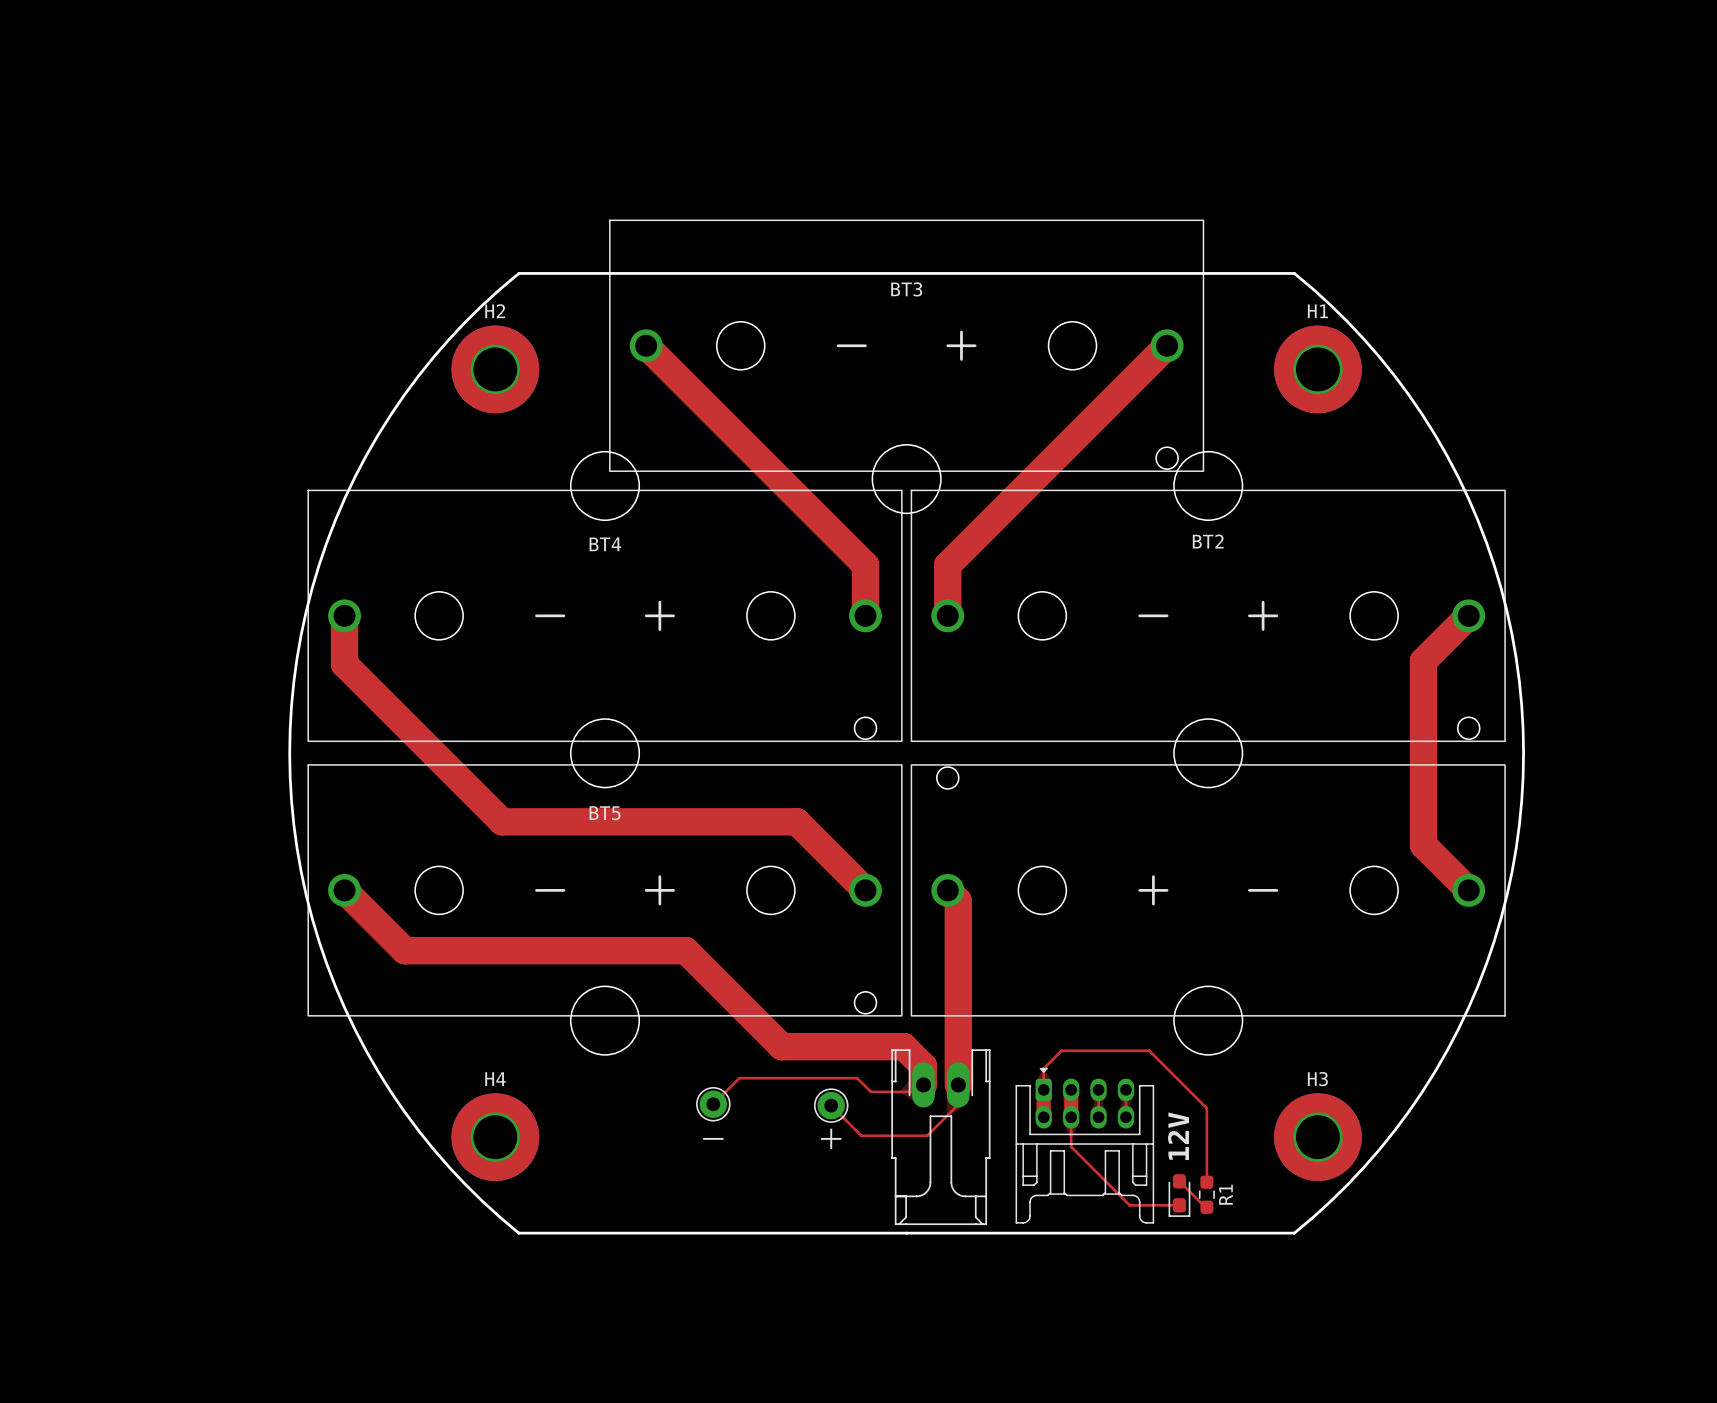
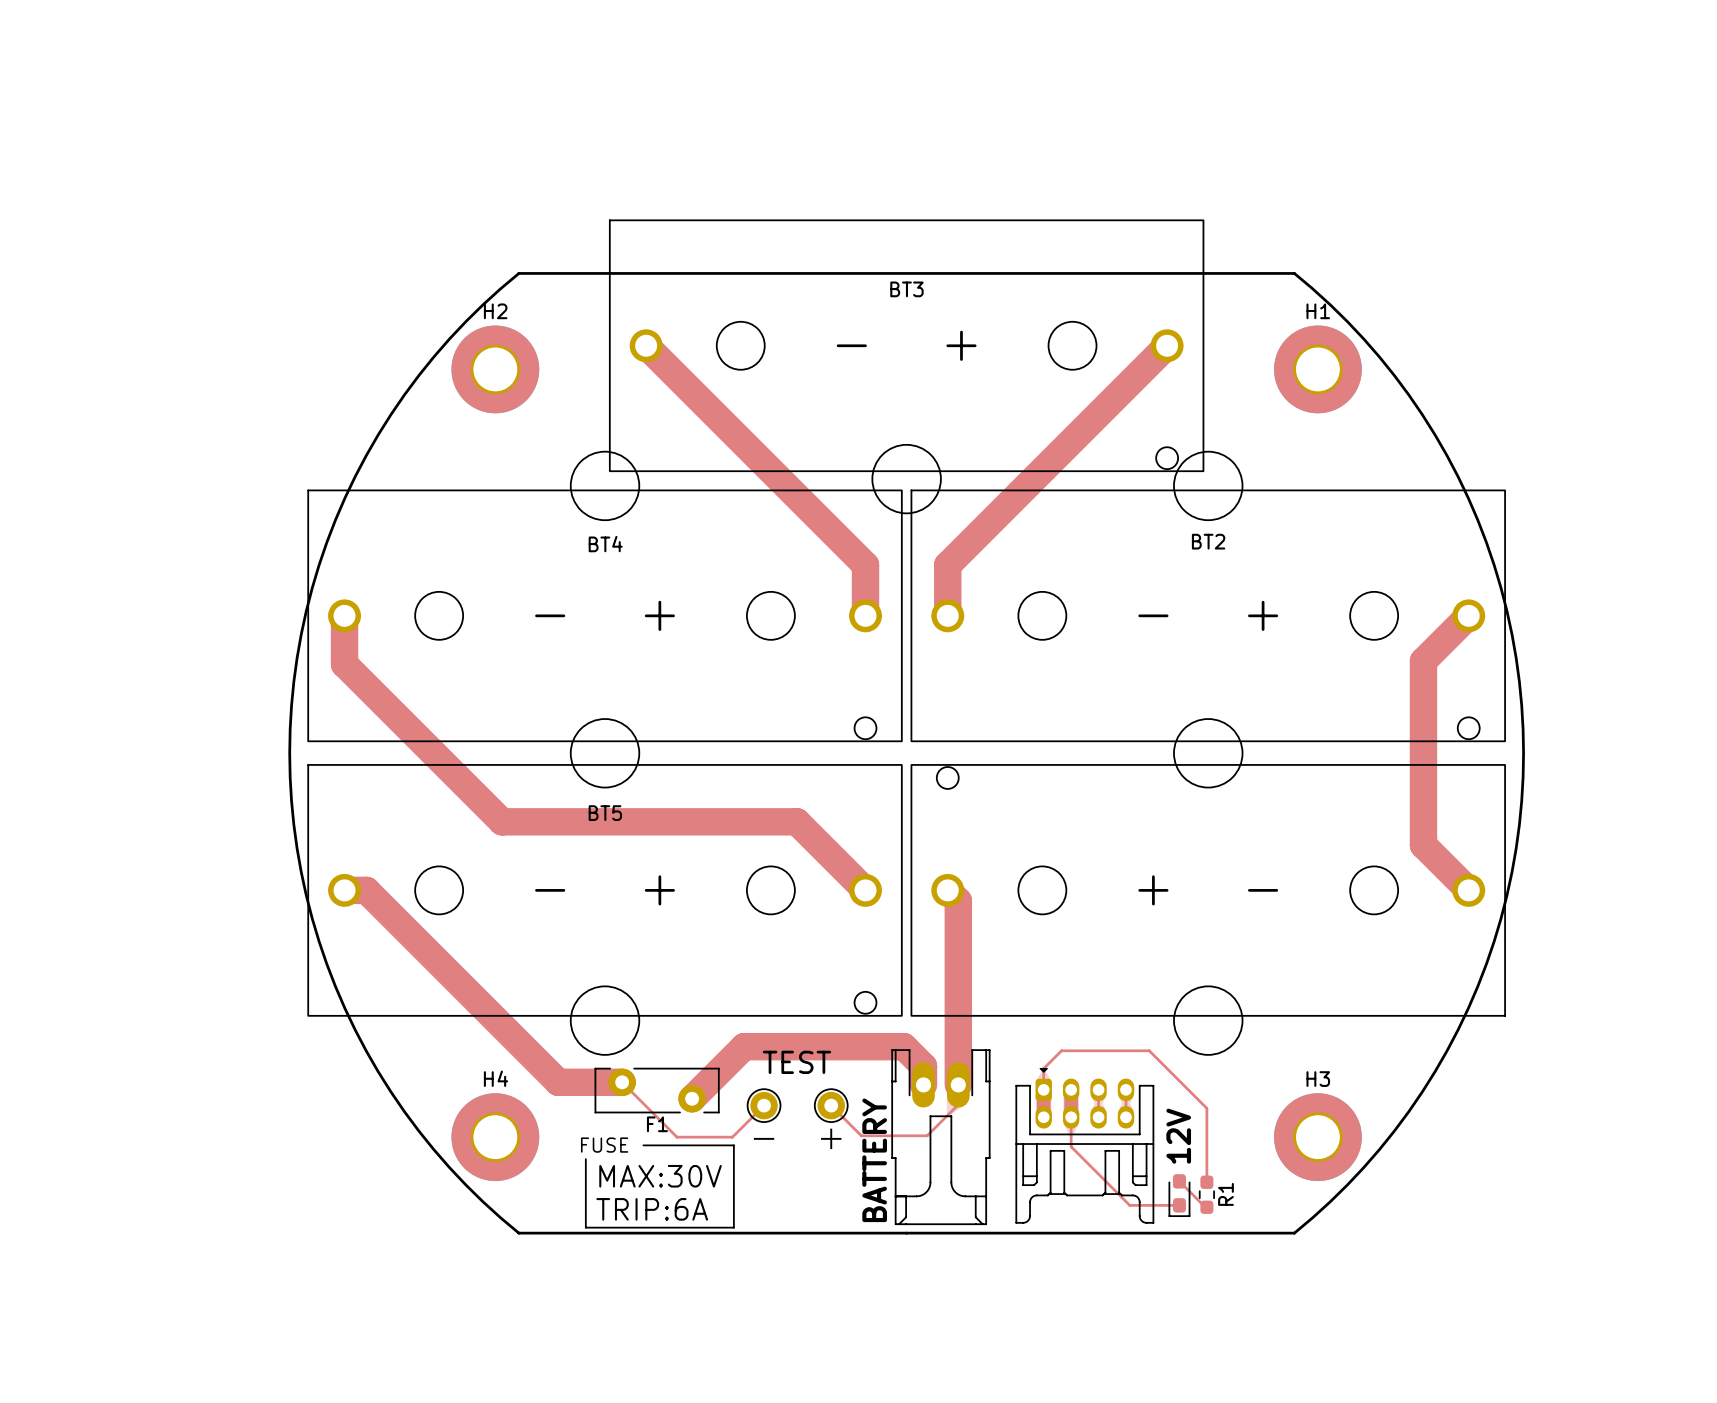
top track: (344, 890) (404, 950) (685, 950) (781, 1046) -> (344, 890) (366, 890) (558, 1082) (622, 1082) (677, 1137) (732, 1137) (764, 1105)
top track: none -> (781, 1046) (744, 1046) (692, 1098)
text: none -> TEST (796, 1062)
F1: none -> (657, 1090)
top track: (916, 1091) (870, 1091) (857, 1078) (739, 1078) (713, 1104) -> none
part position: (713, 1104) -> (764, 1105)
text position: － (713, 1138) -> － (764, 1138)
text: none -> FUSE (604, 1145)
line: none -> (643, 1145) (733, 1145) (733, 1227) (585, 1227) (585, 1159)
text: none -> BATTERY (874, 1160)
text: none -> MAX:30V (660, 1176)
text: none -> TRIP:6A (652, 1209)

